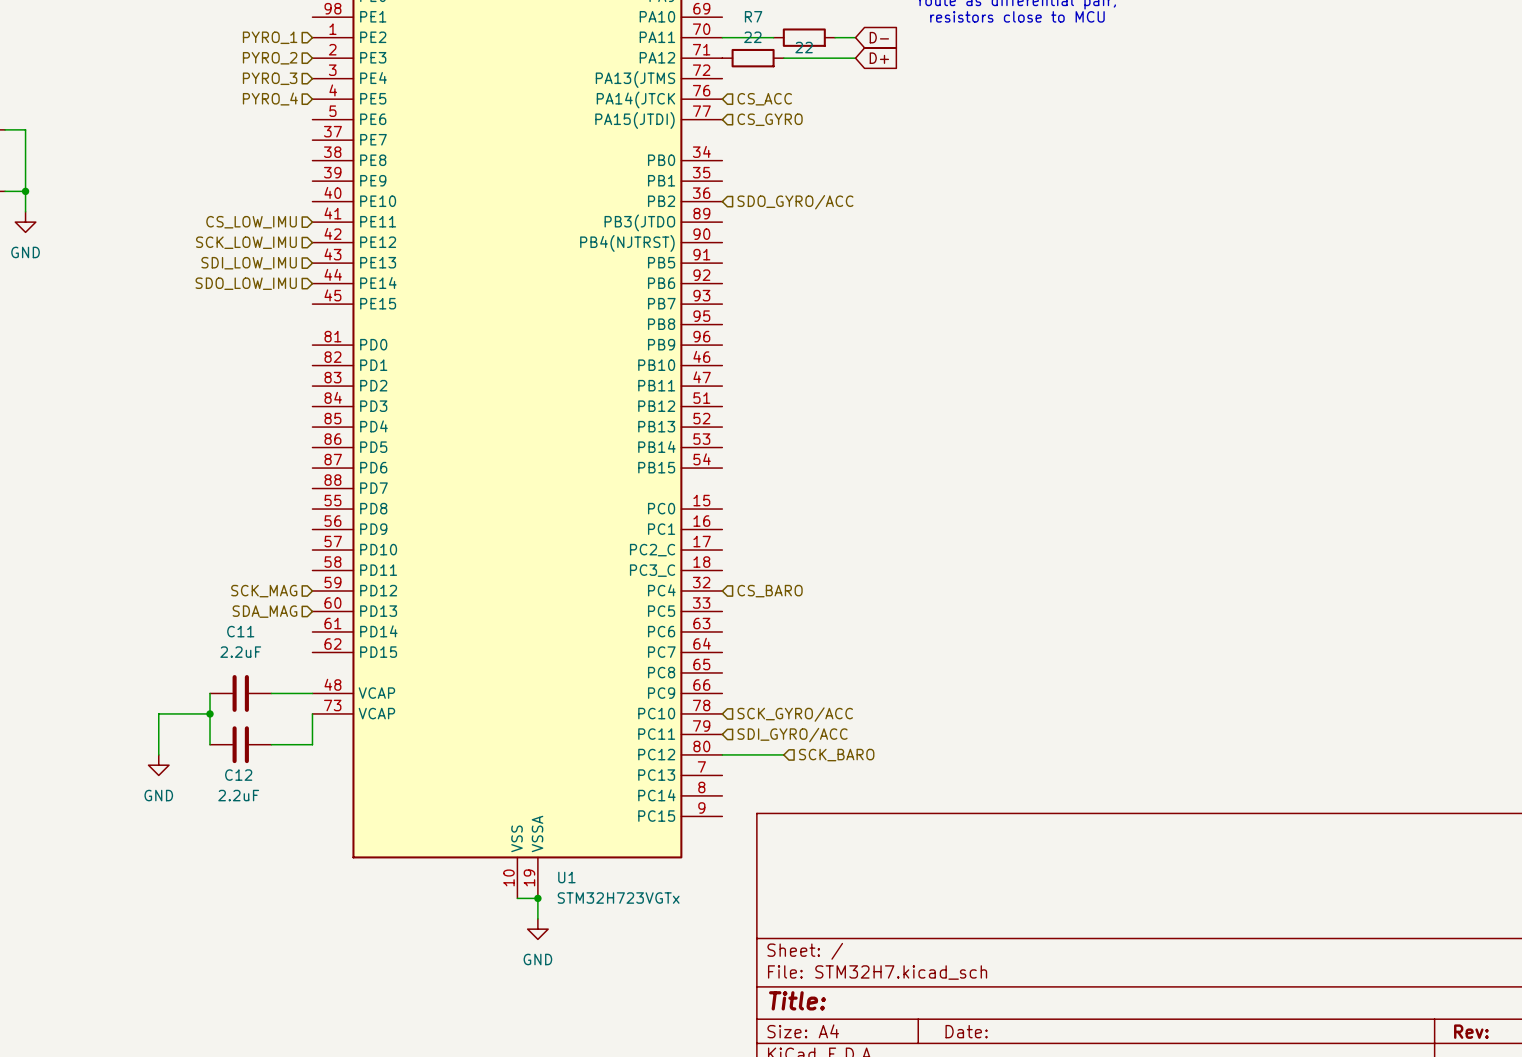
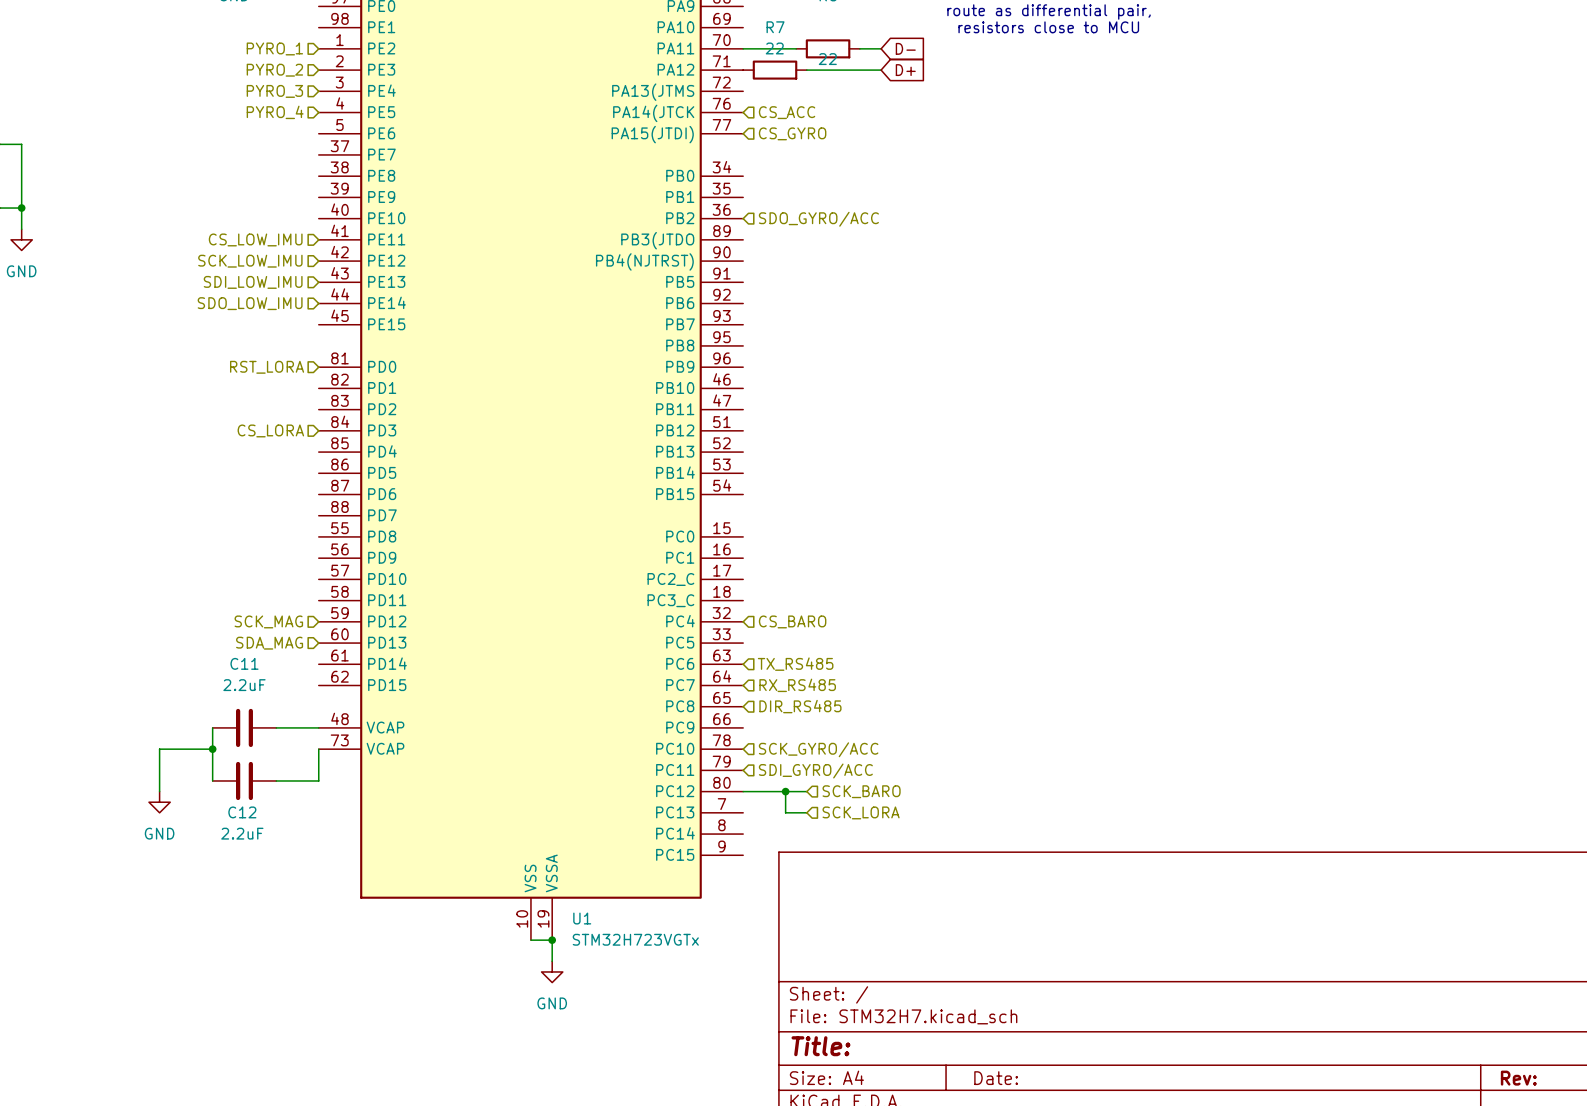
hierarchical label: none -> RST_LORA (267, 367)
hierarchical label: none -> CS_LORA (270, 430)
hierarchical label: none -> TX_RS485 (795, 664)
hierarchical label: none -> RX_RS485 (797, 685)
hierarchical label: none -> DIR_RS485 (800, 706)
wire: none -> (785, 791) (785, 812) (806, 812)
junction: none -> (785, 791)
hierarchical label: none -> SCK_LORA (861, 812)

